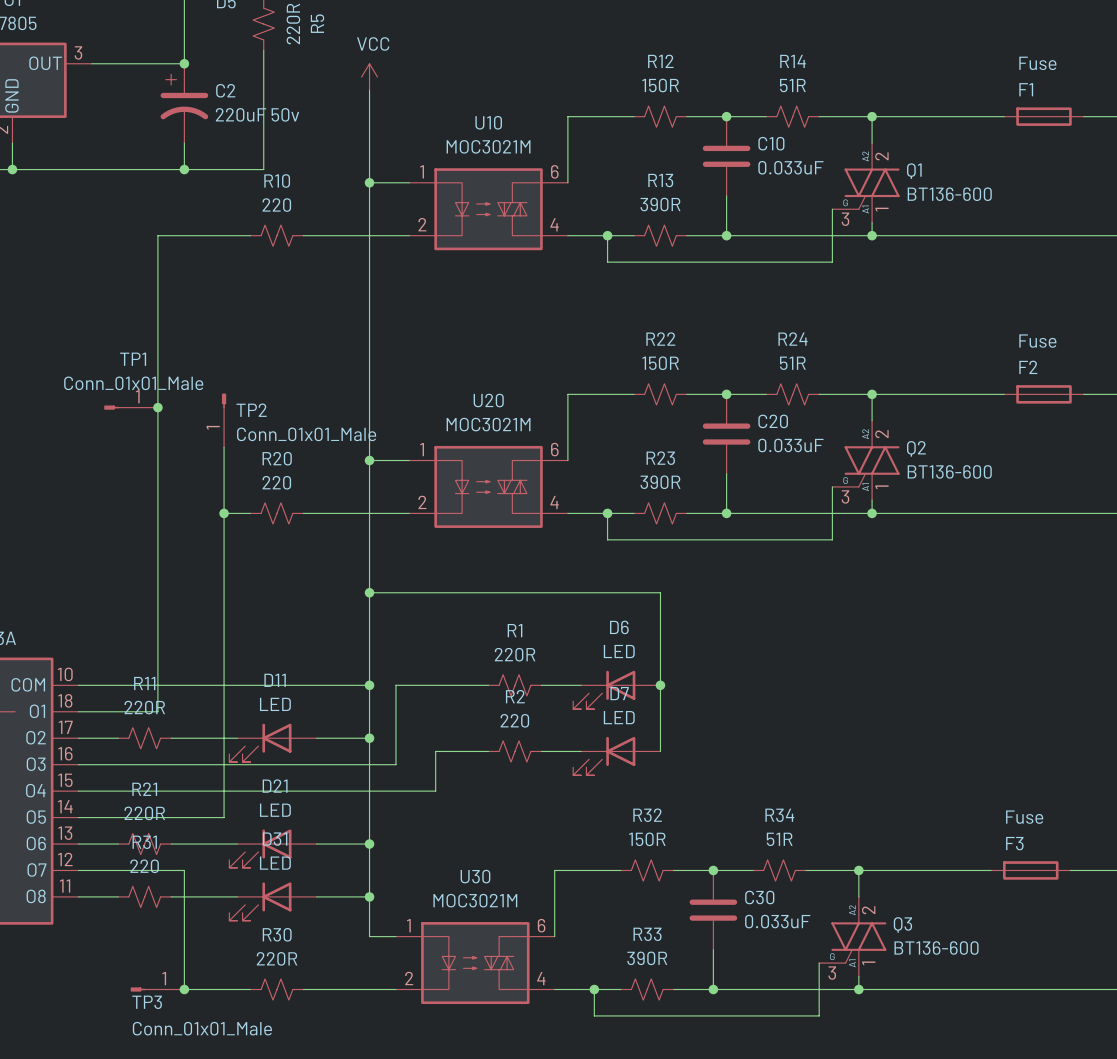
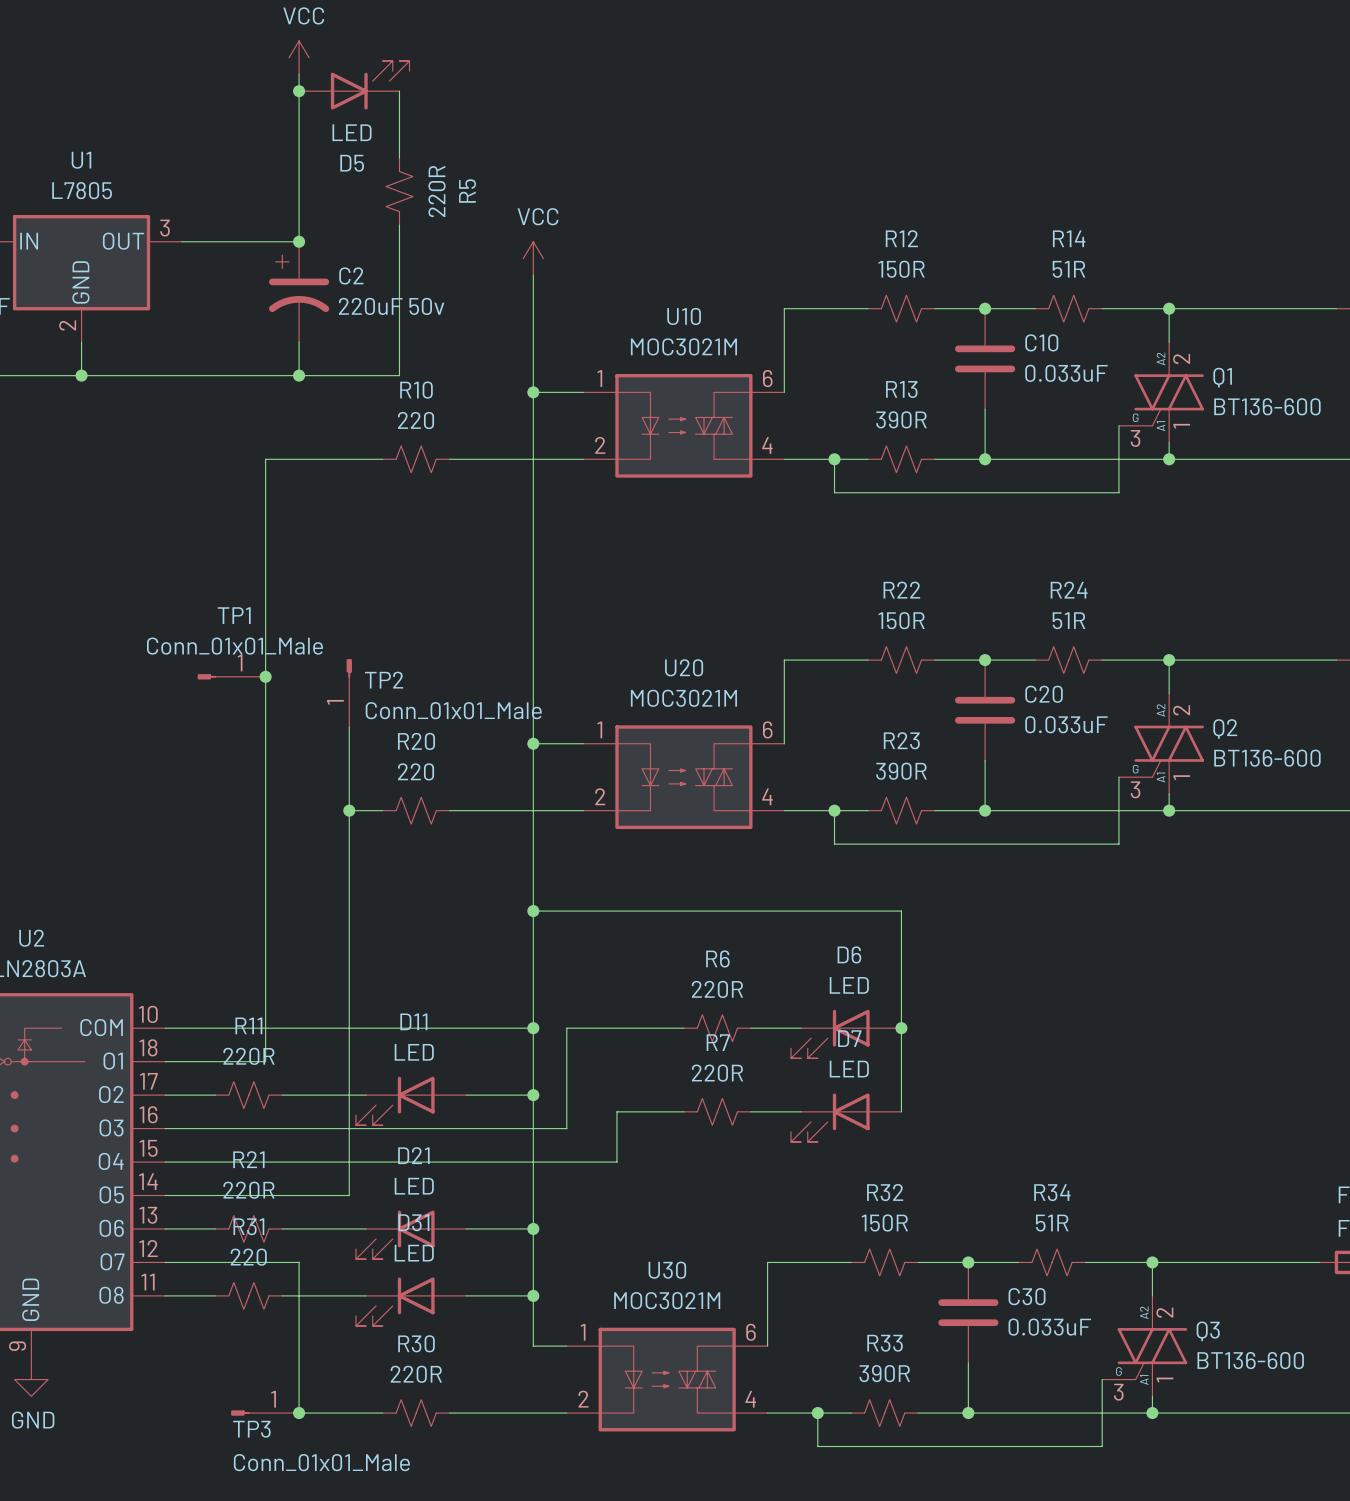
R1 name: R1 (515, 630) -> R6 (717, 958)
R2 name: R2 (515, 696) -> R7 (718, 1042)
R2 value: 220 (514, 720) -> 220R (717, 1073)

